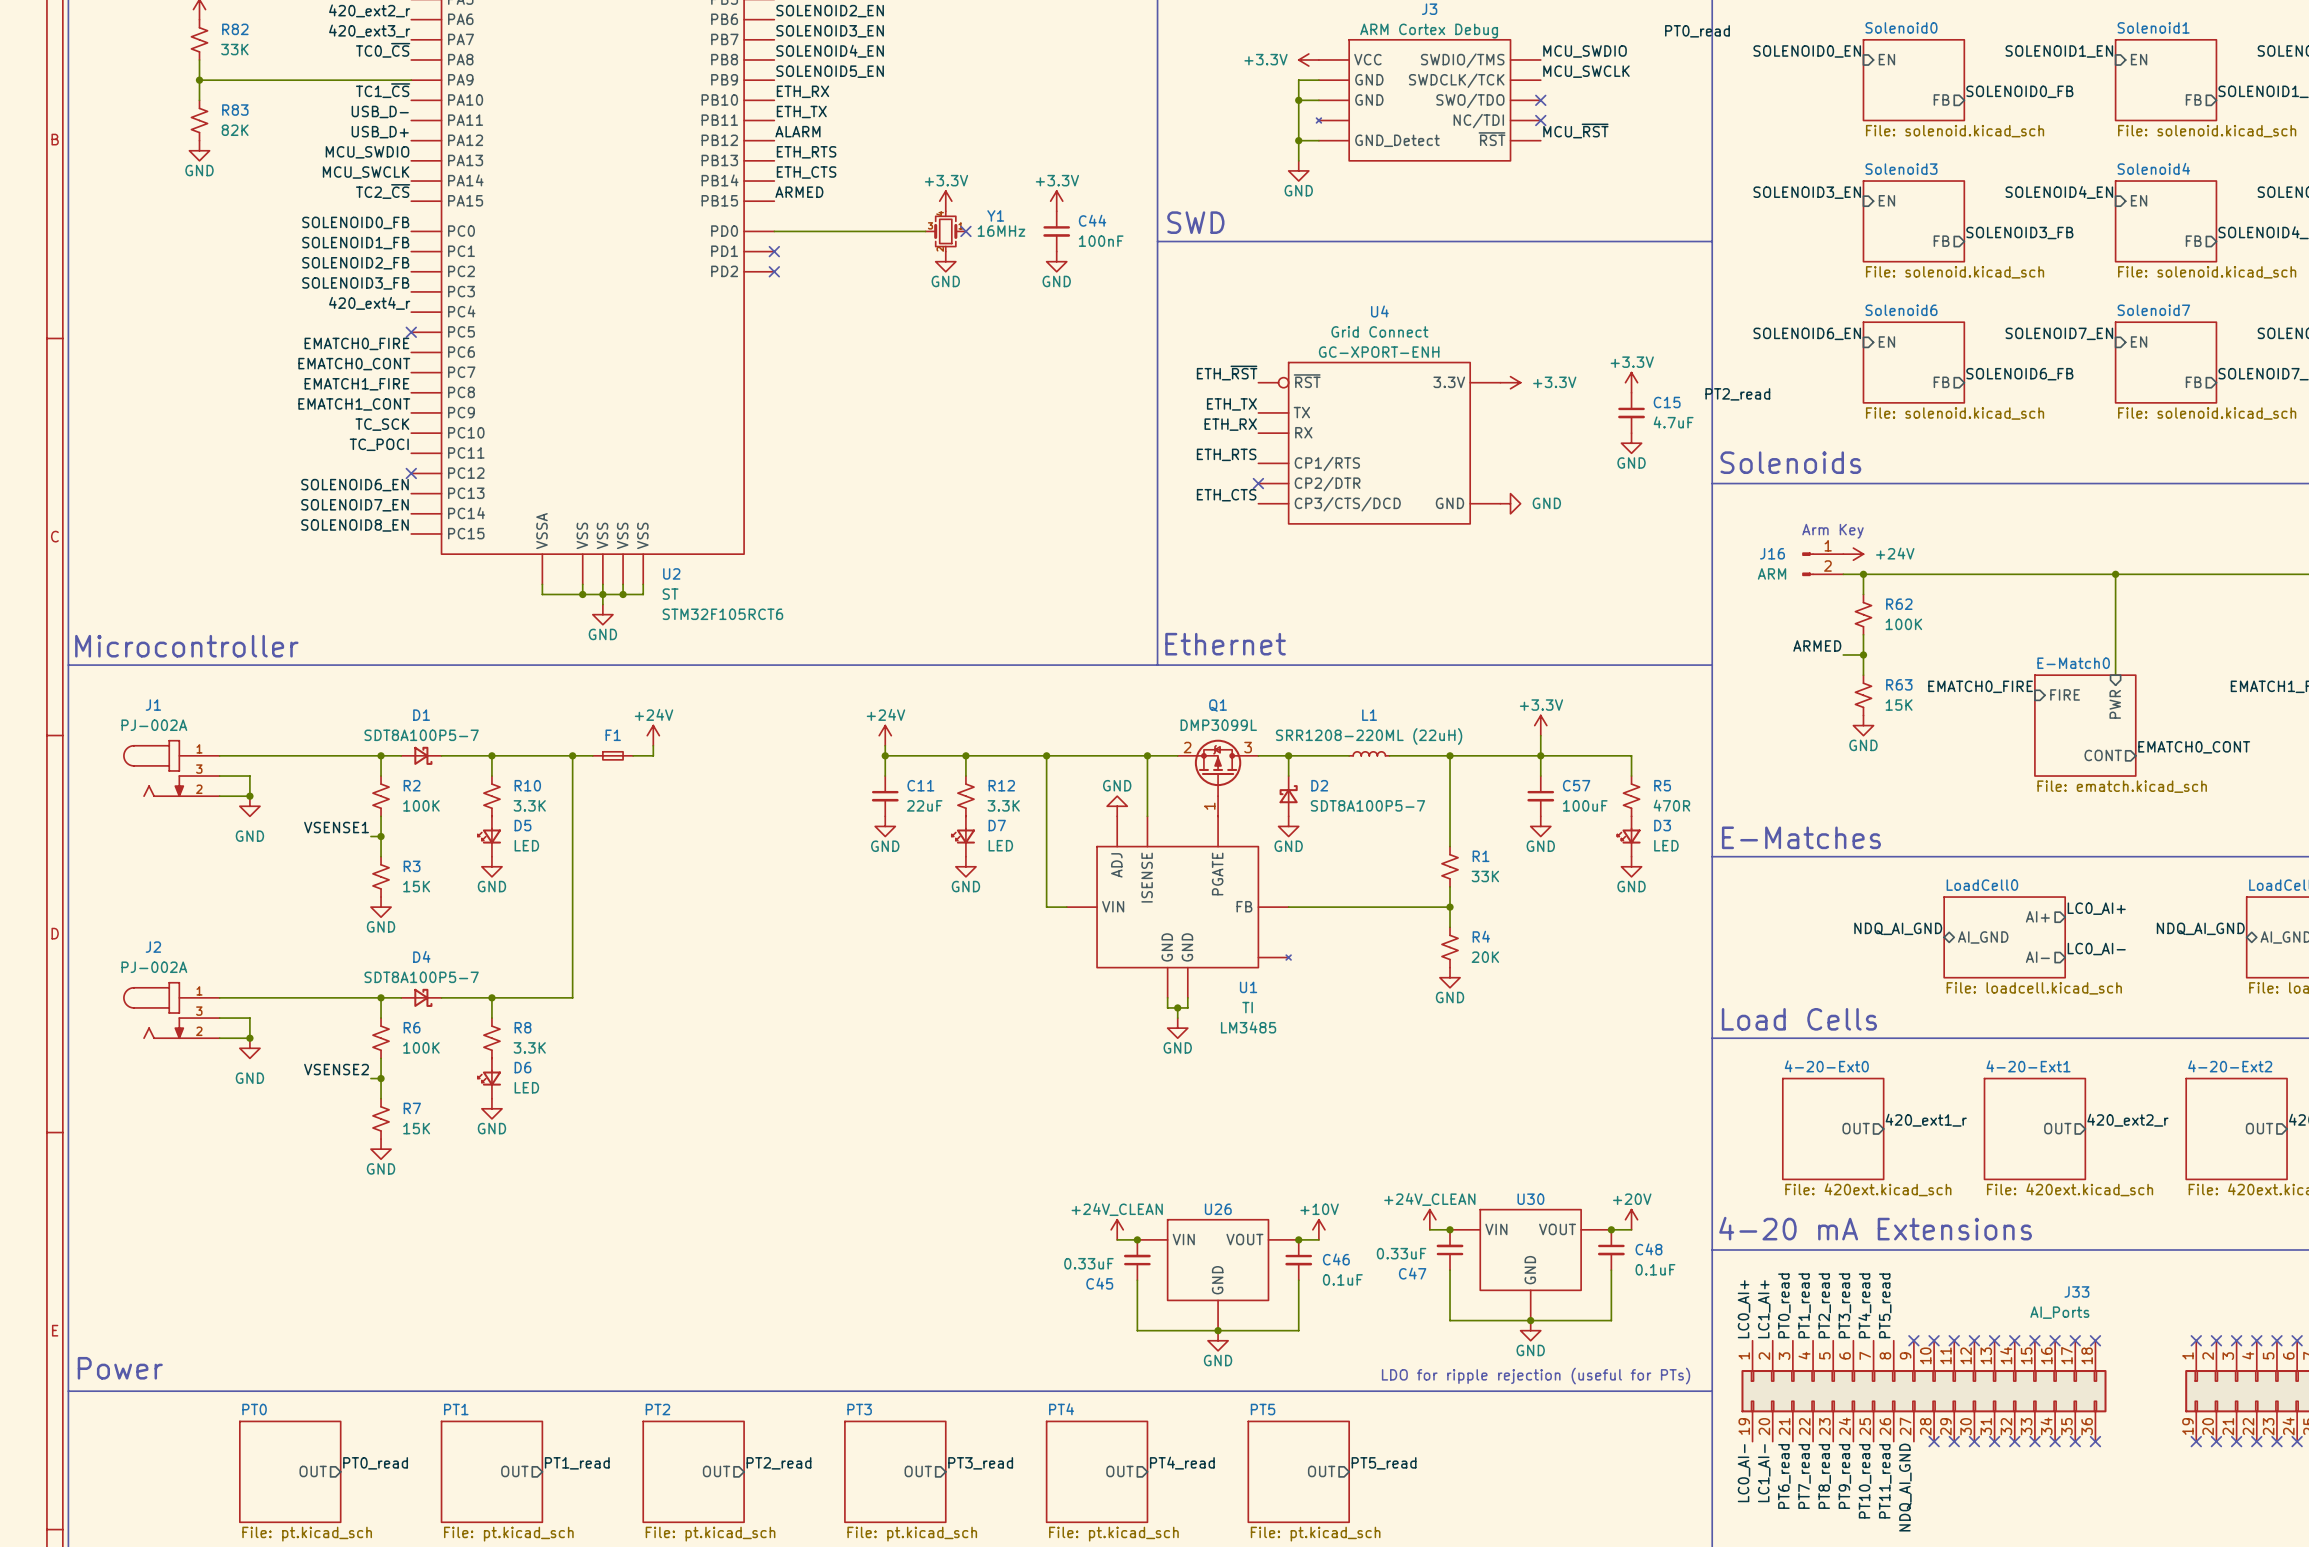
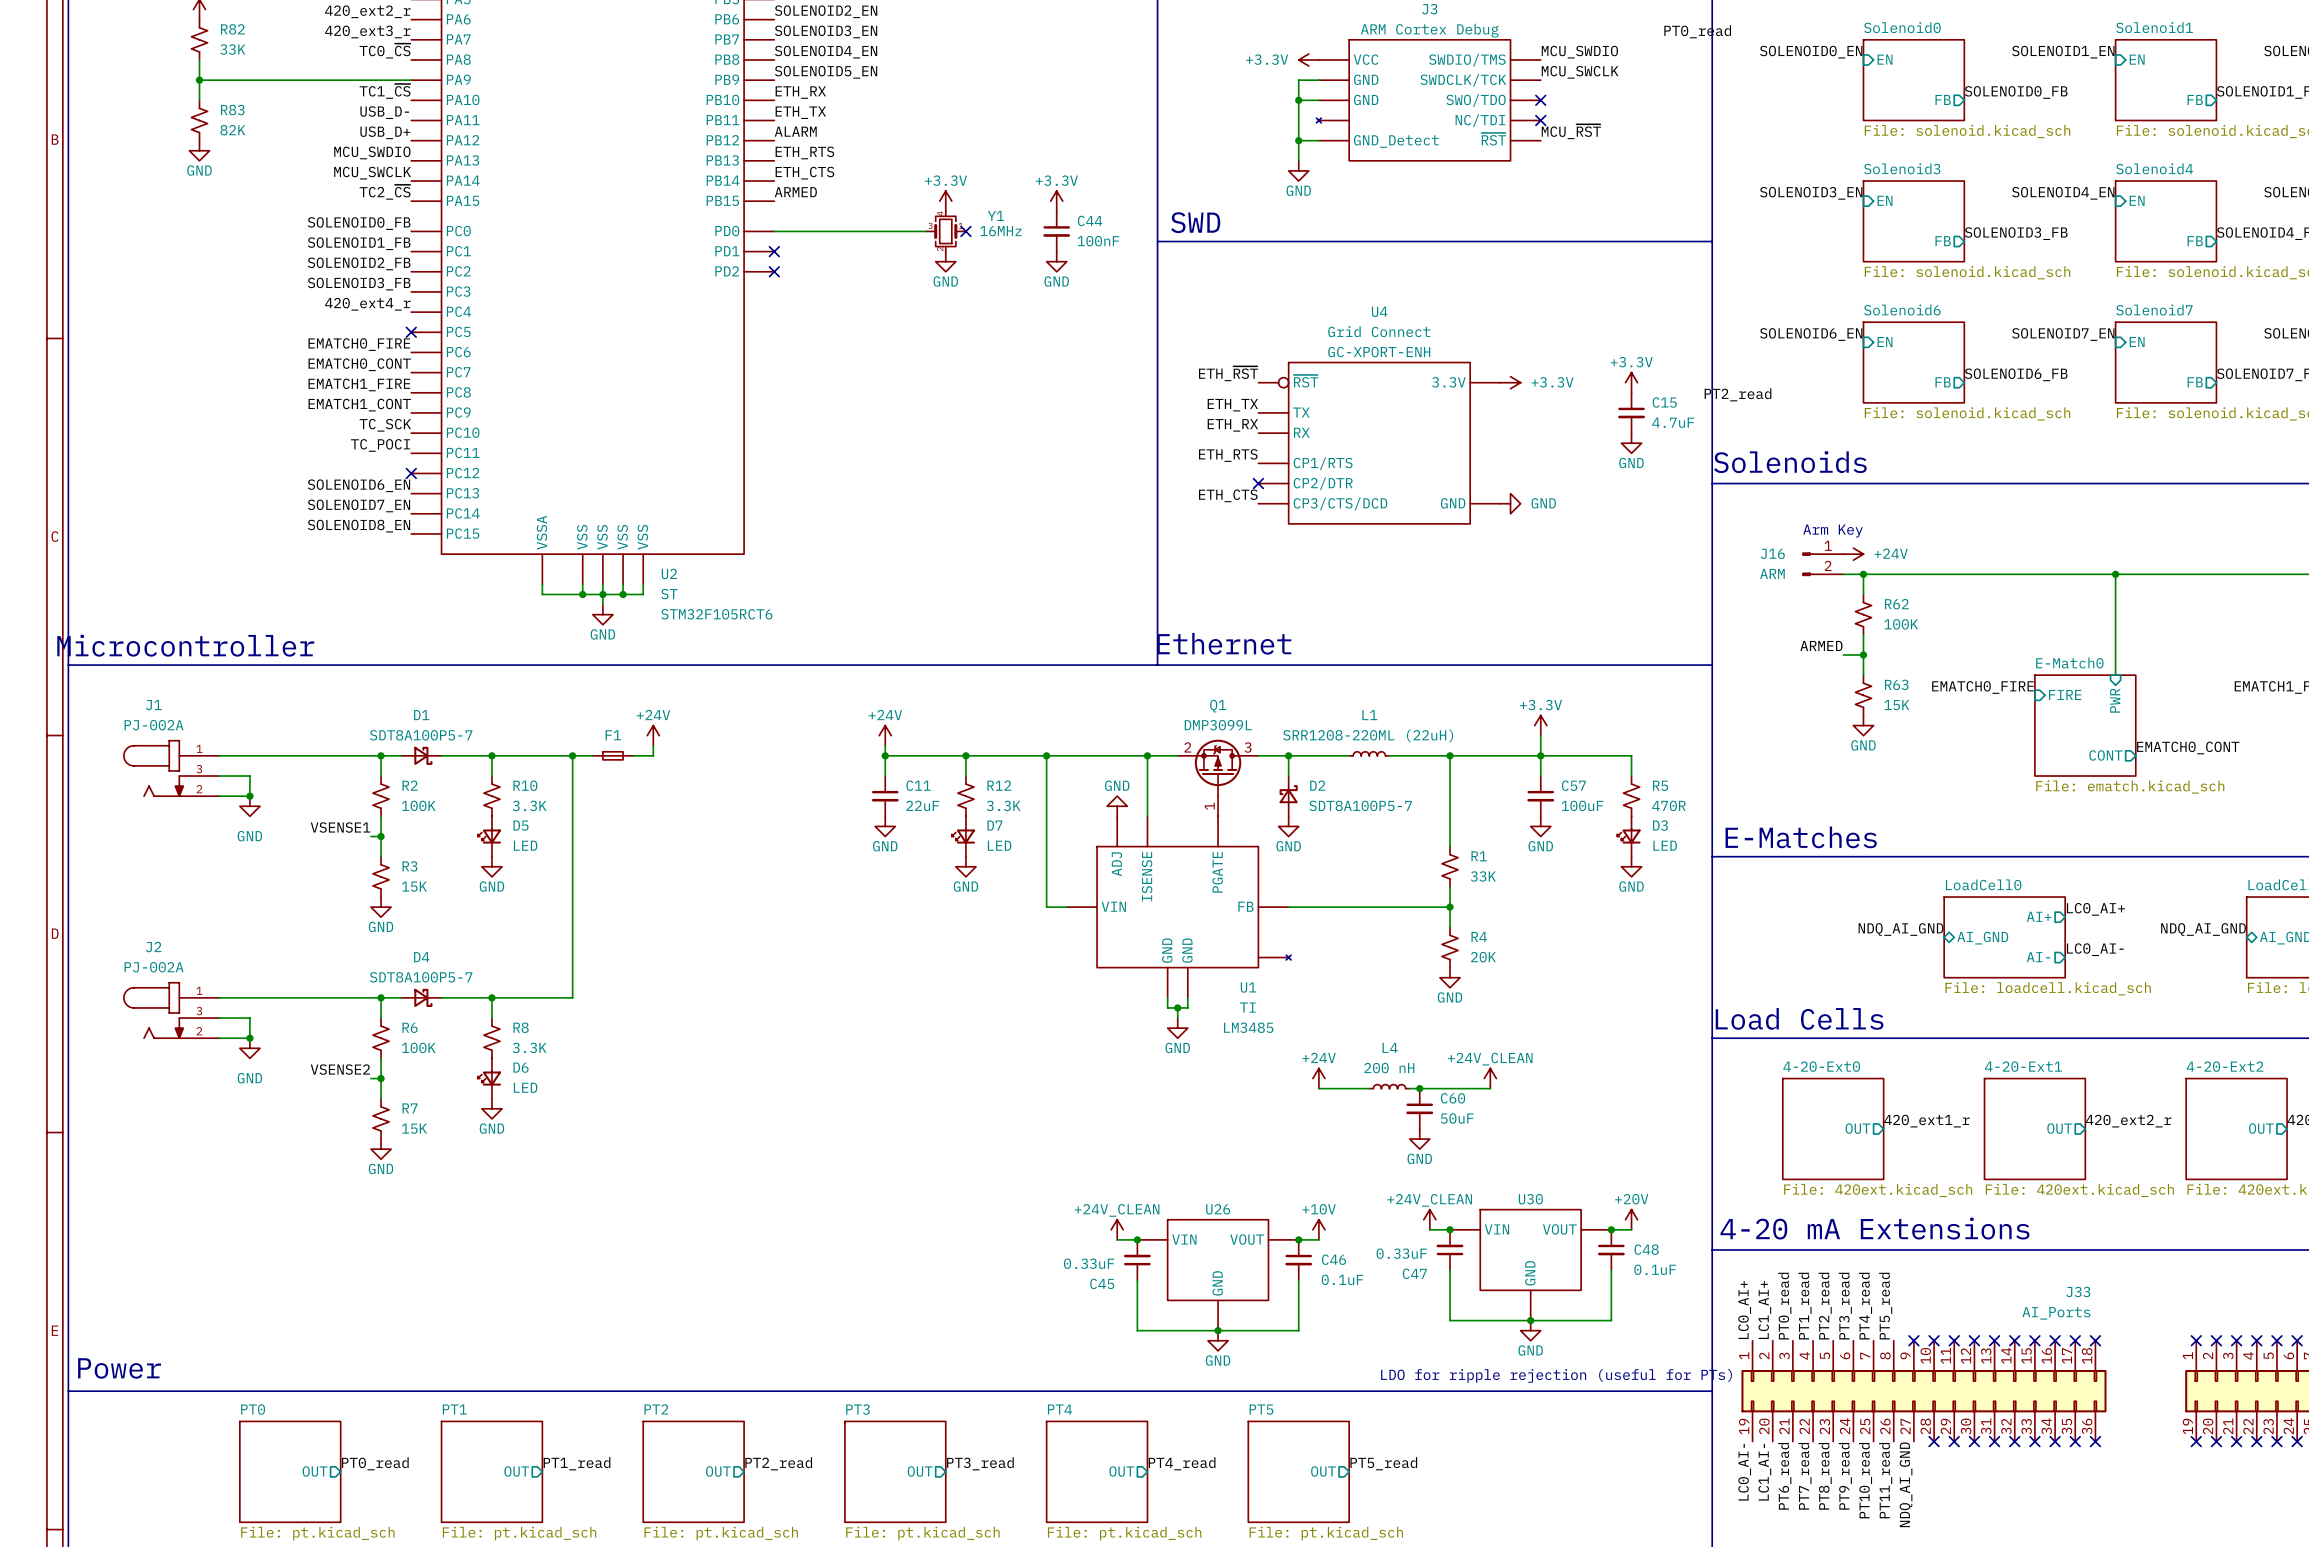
power symbol: none -> +24V (1318, 1078)
power symbol: none -> +24V_CLEAN (1490, 1078)
L4: none -> 200 nH (1389, 1086)
wire: none -> (1318, 1088) (1369, 1088)
wire: none -> (1409, 1088) (1490, 1088)
junction: none -> (1419, 1088)
C60: none -> 50uF (1419, 1108)
power symbol: none -> GND (1419, 1139)

